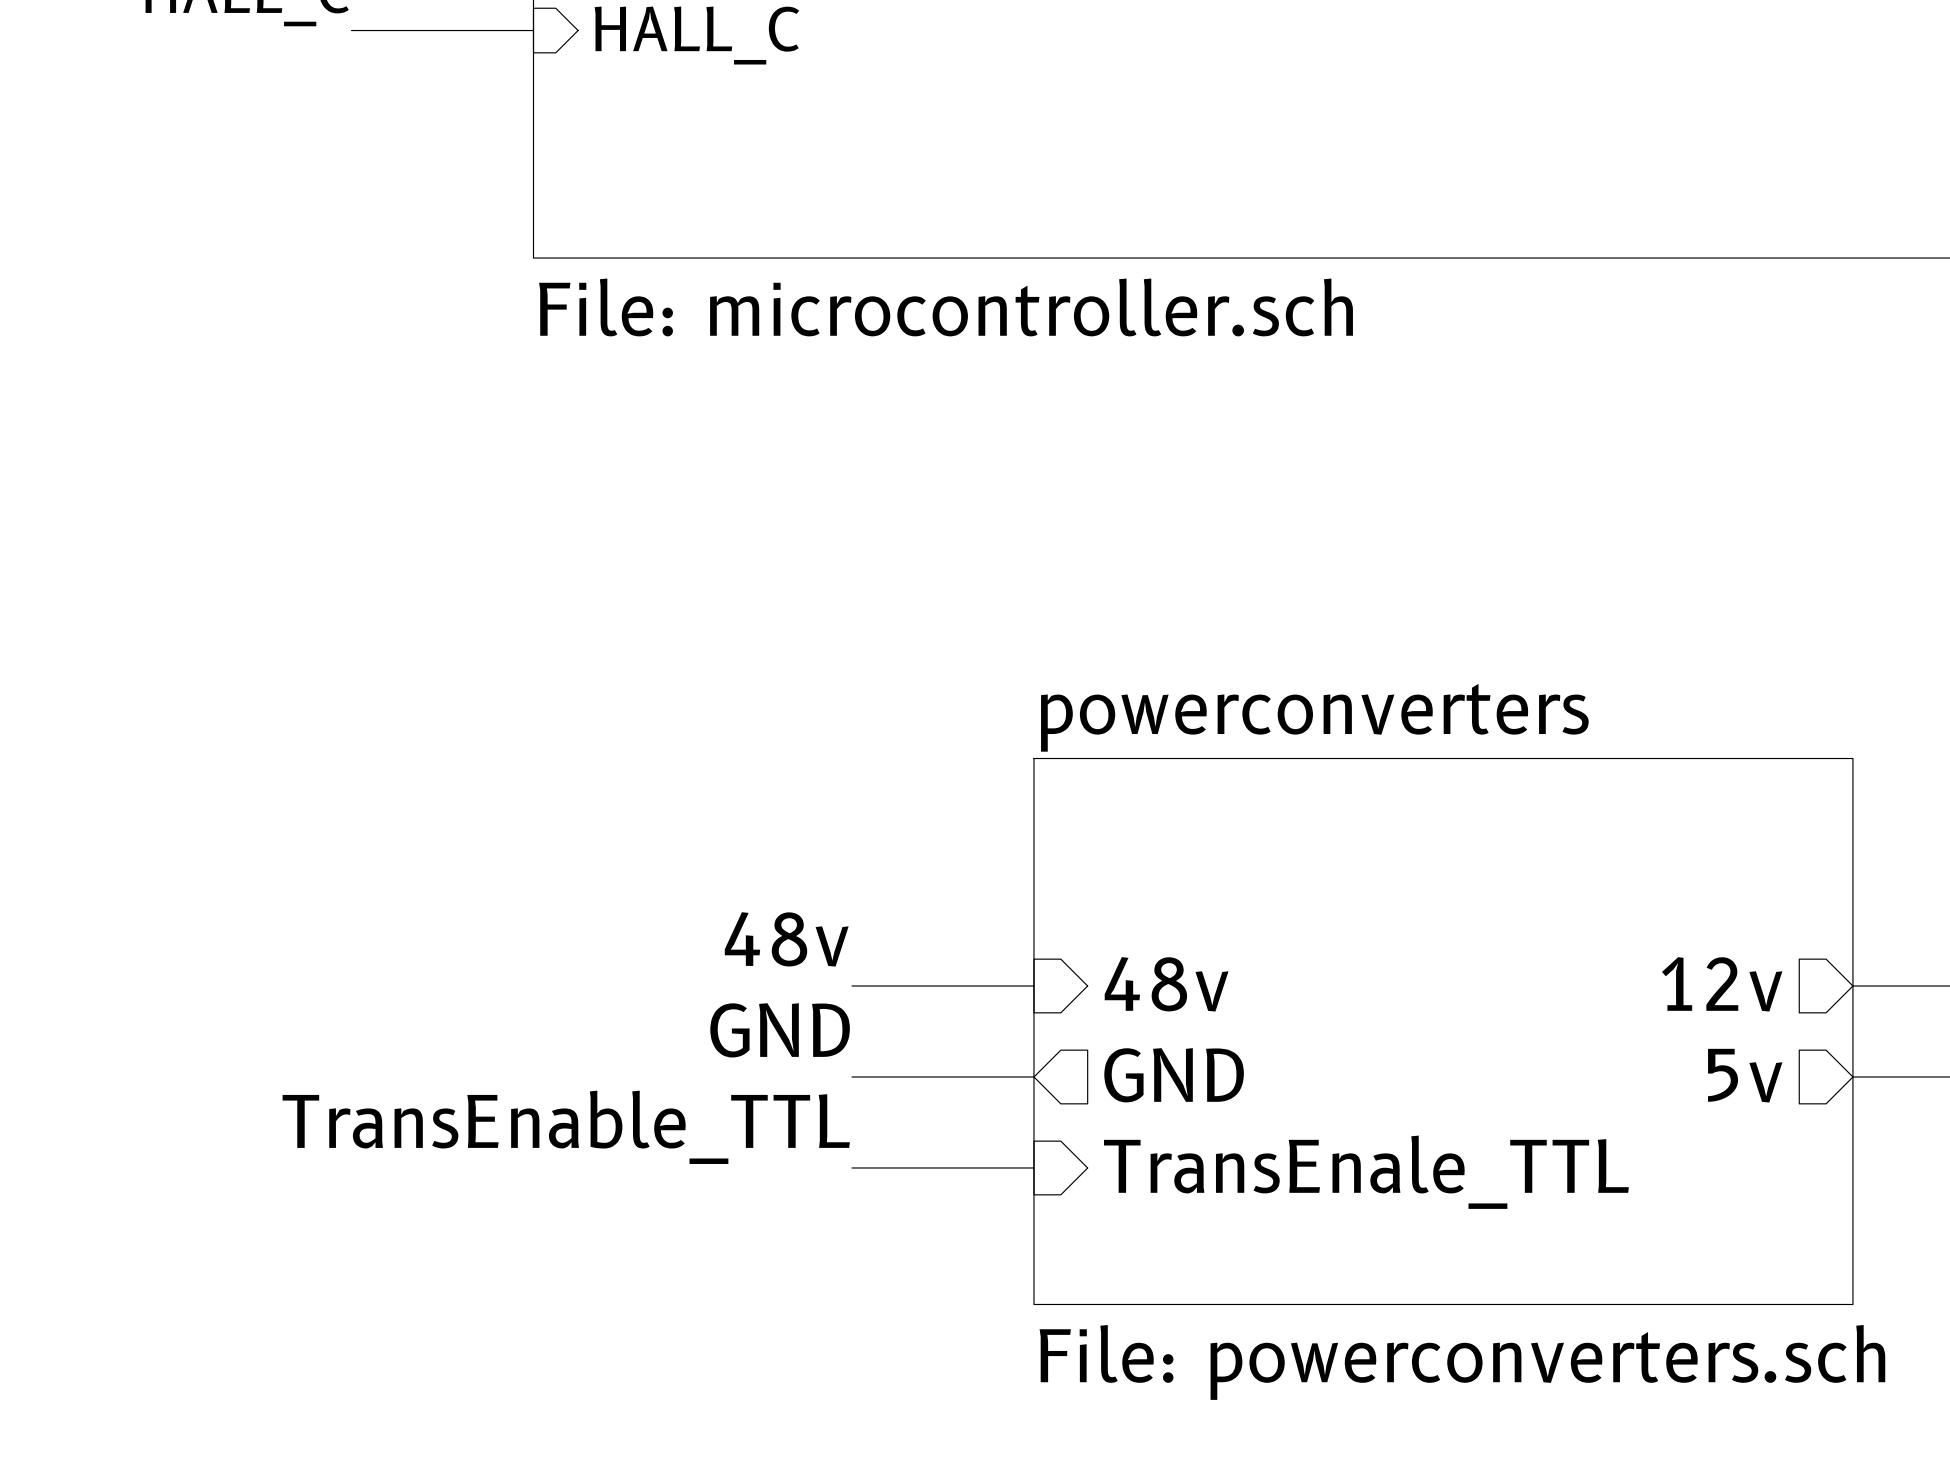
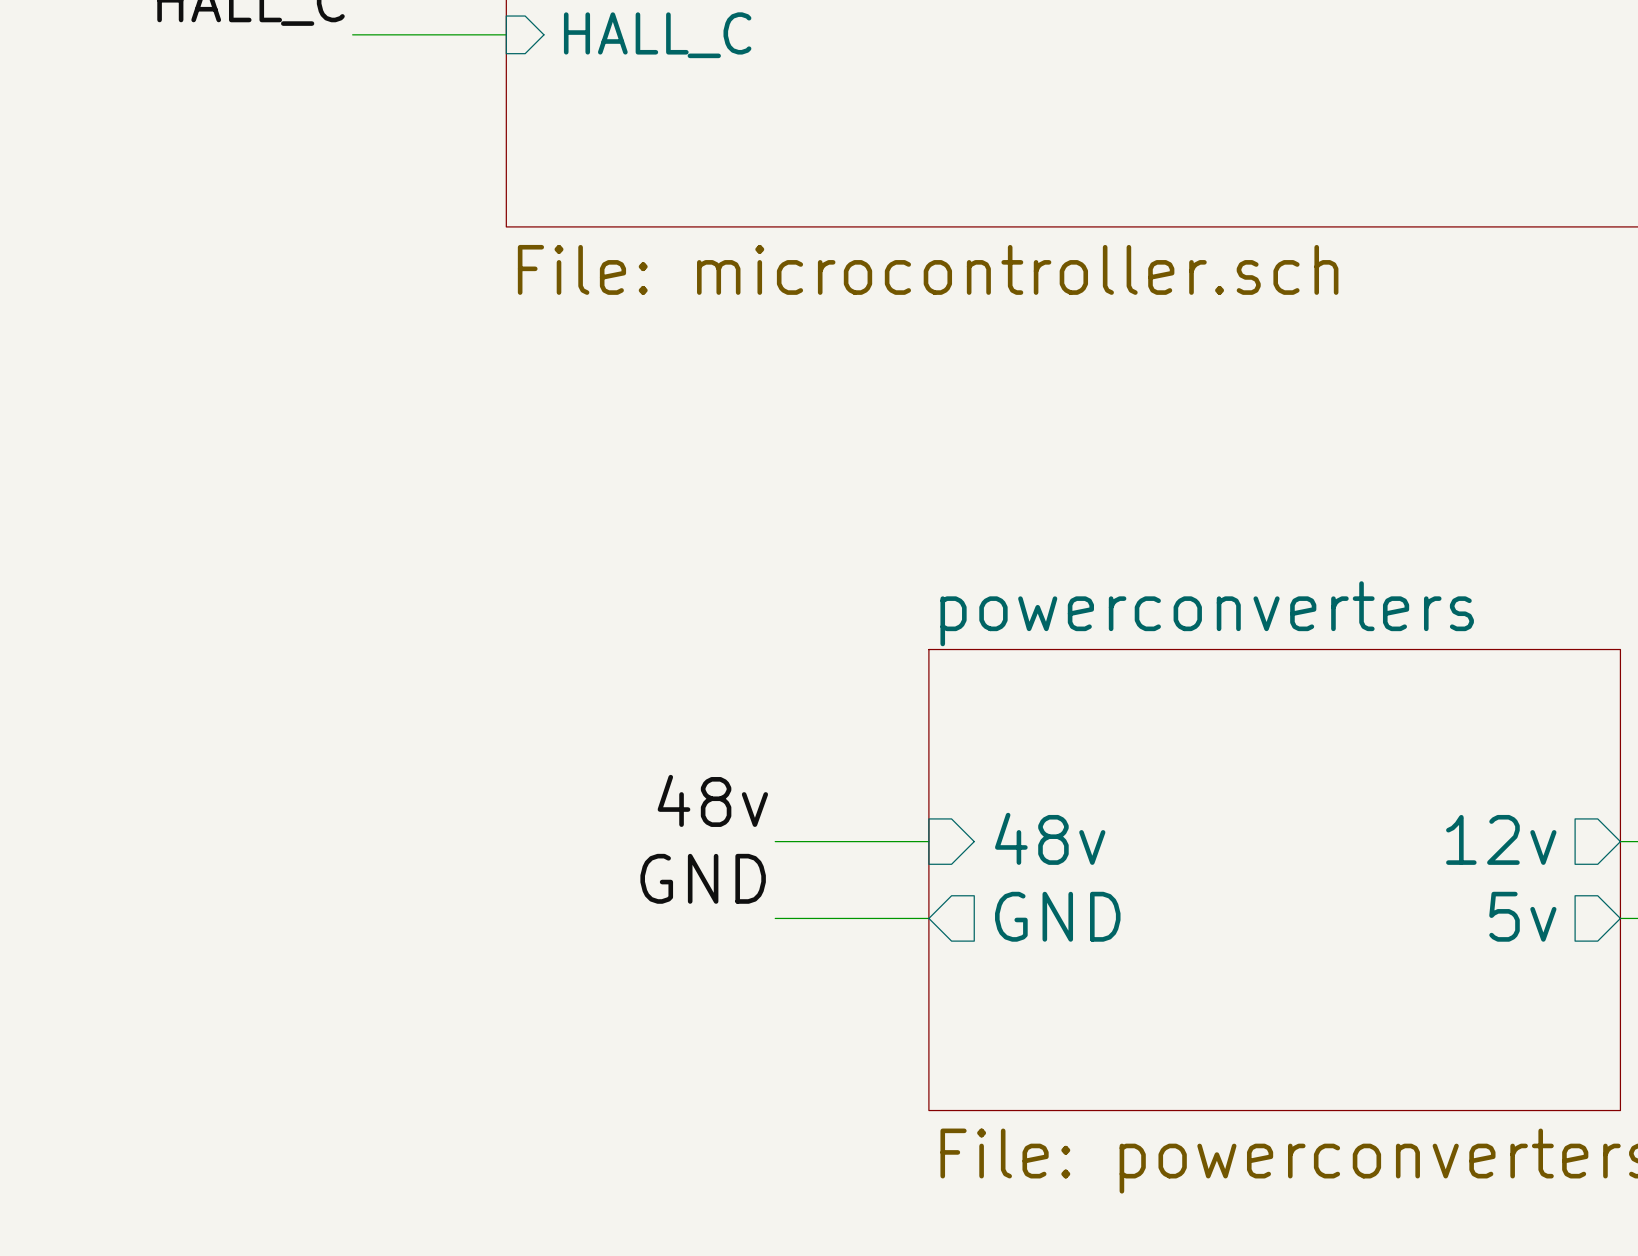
label: TransEnable_TTL (566, 1127) -> none
wire: (851, 1167) (1033, 1167) -> none
sheet pin: TransEnale_TTL (1366, 1172) -> none

